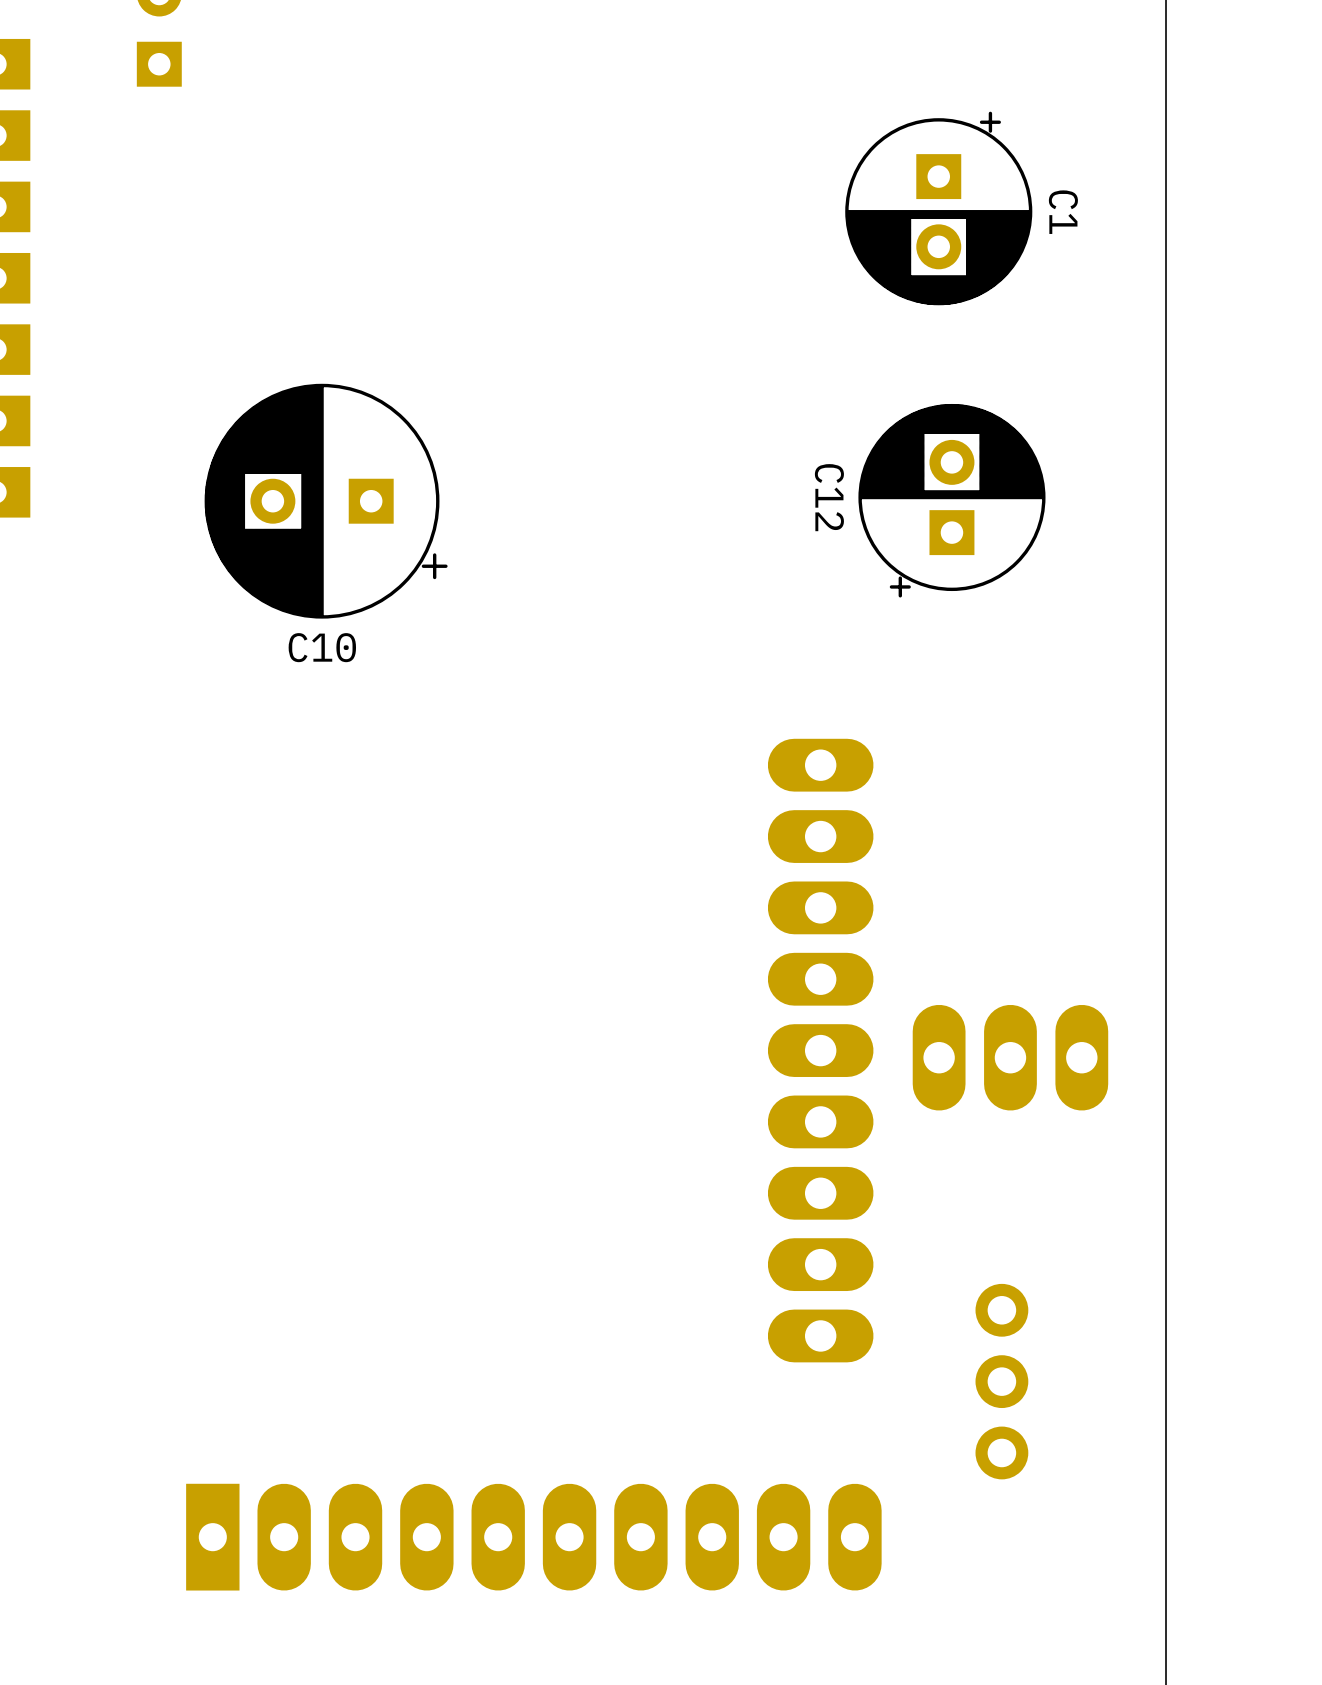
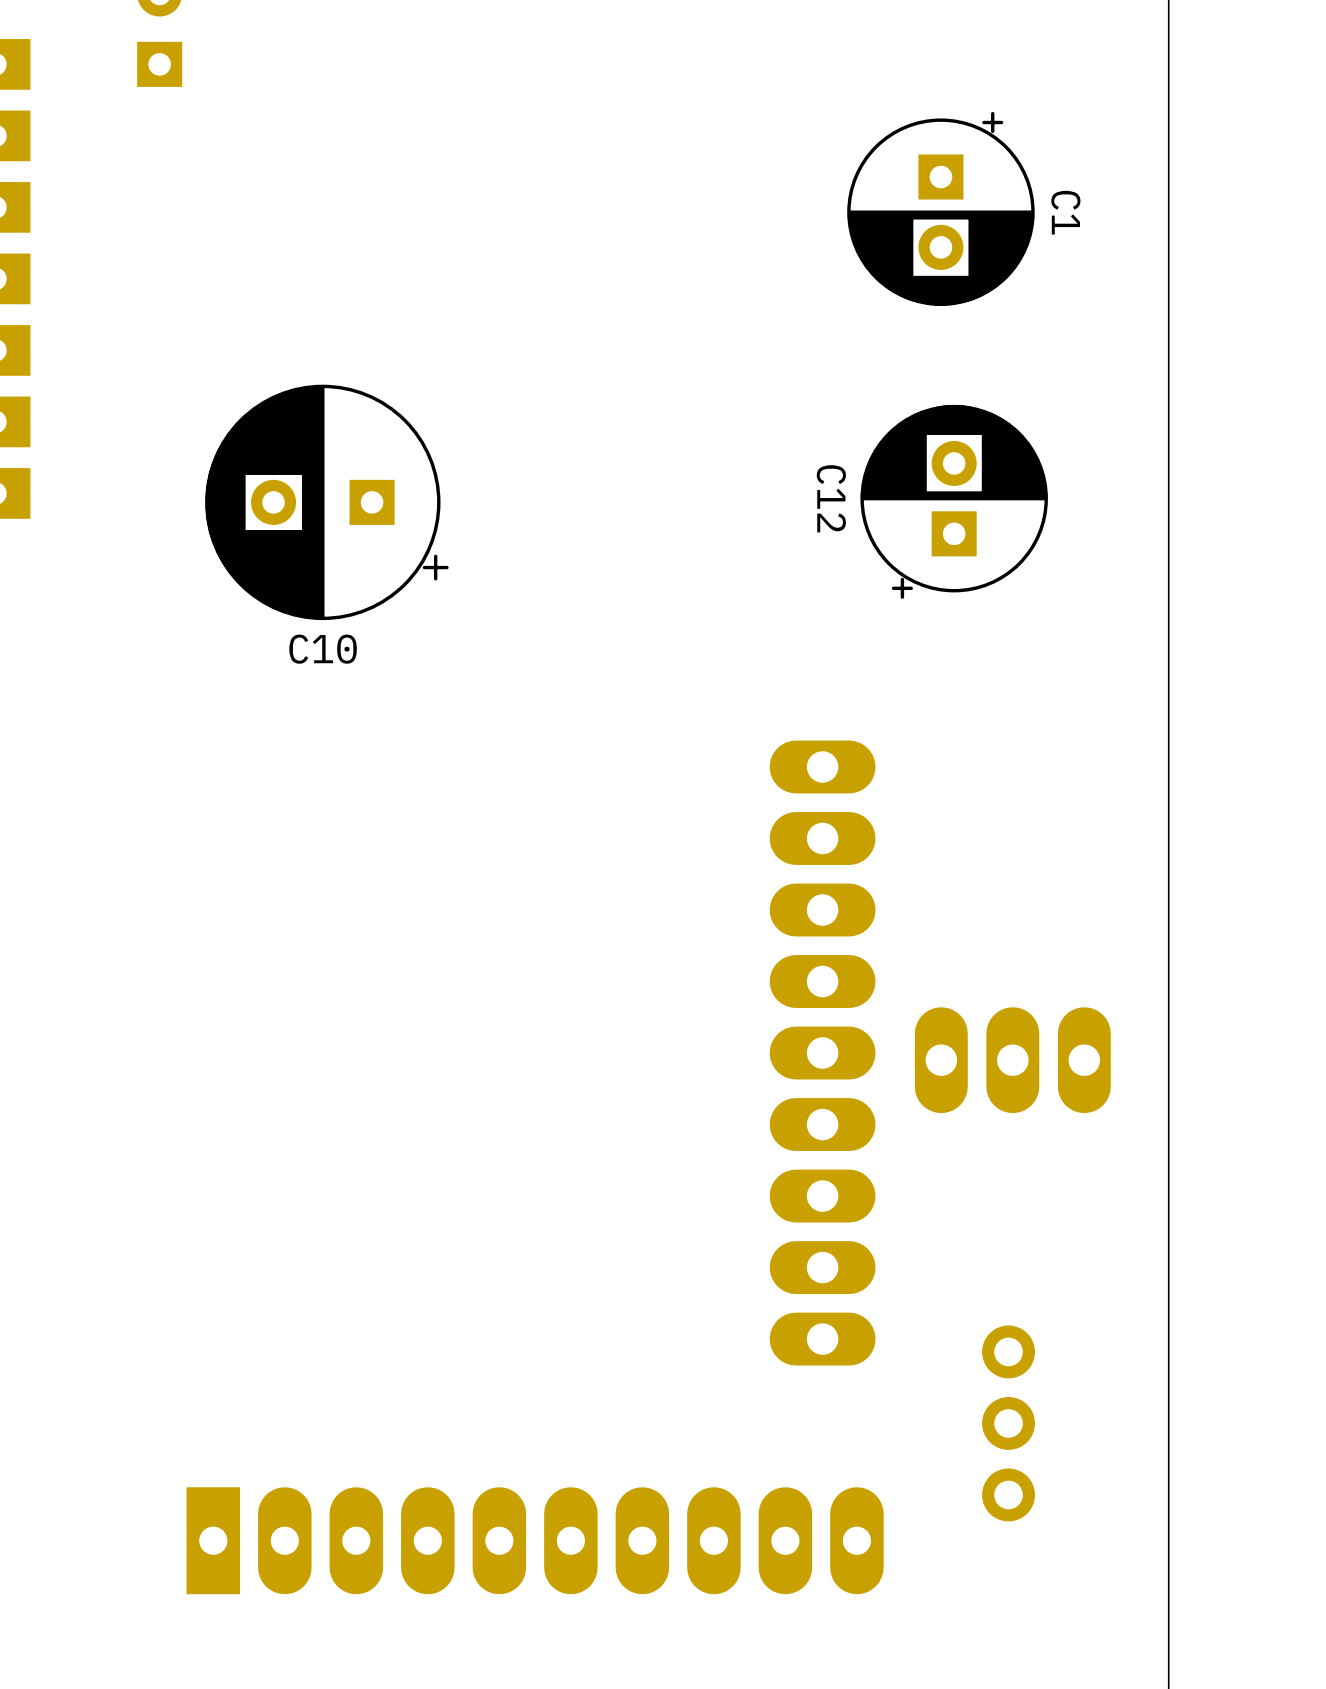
part position: (1001, 1381) -> (1008, 1423)

